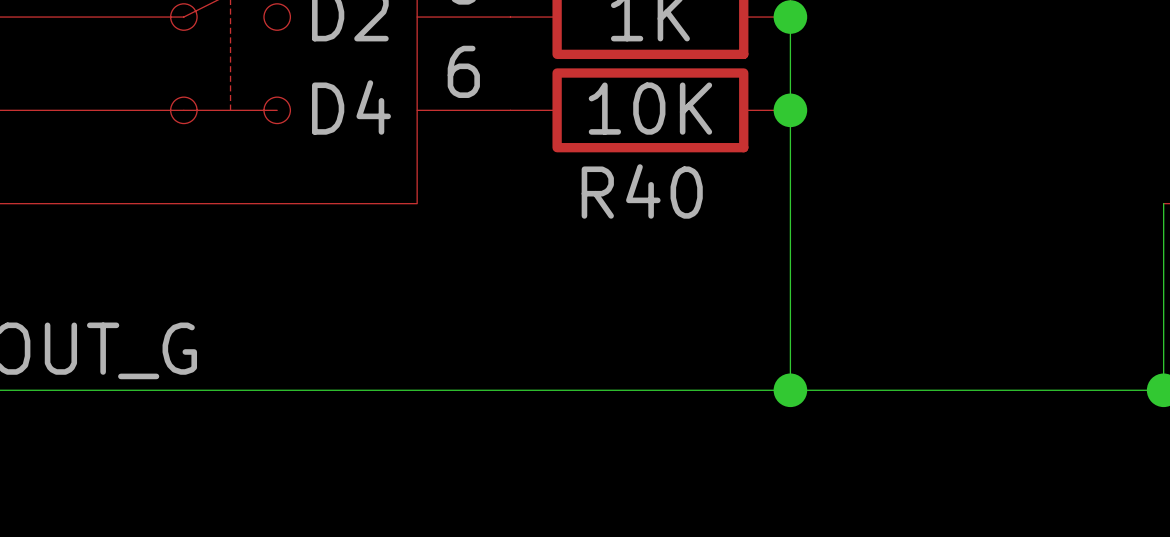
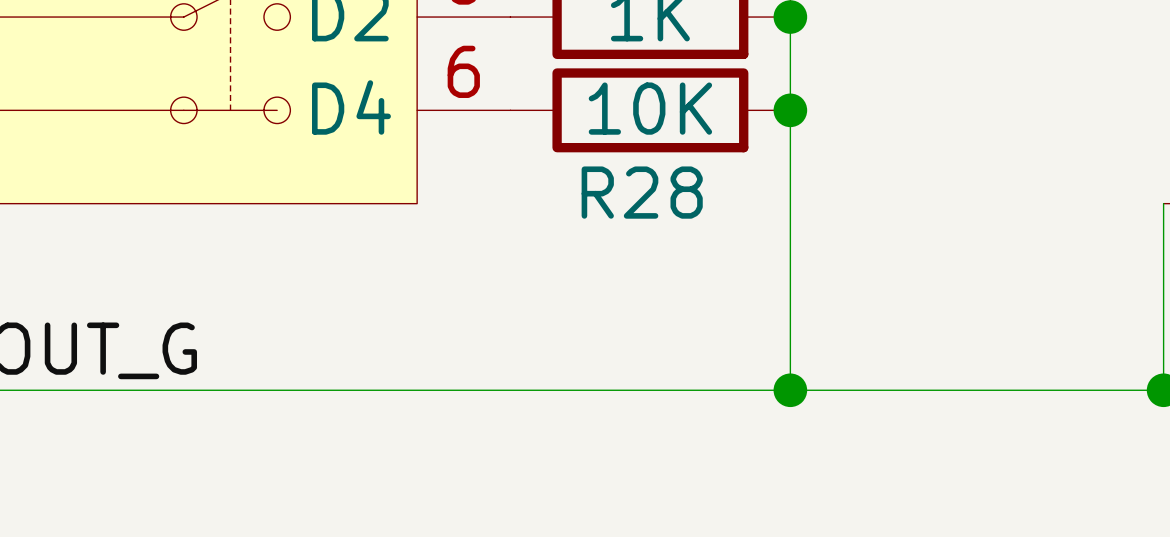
R40 name: R40 (642, 191) -> R28 (642, 192)

